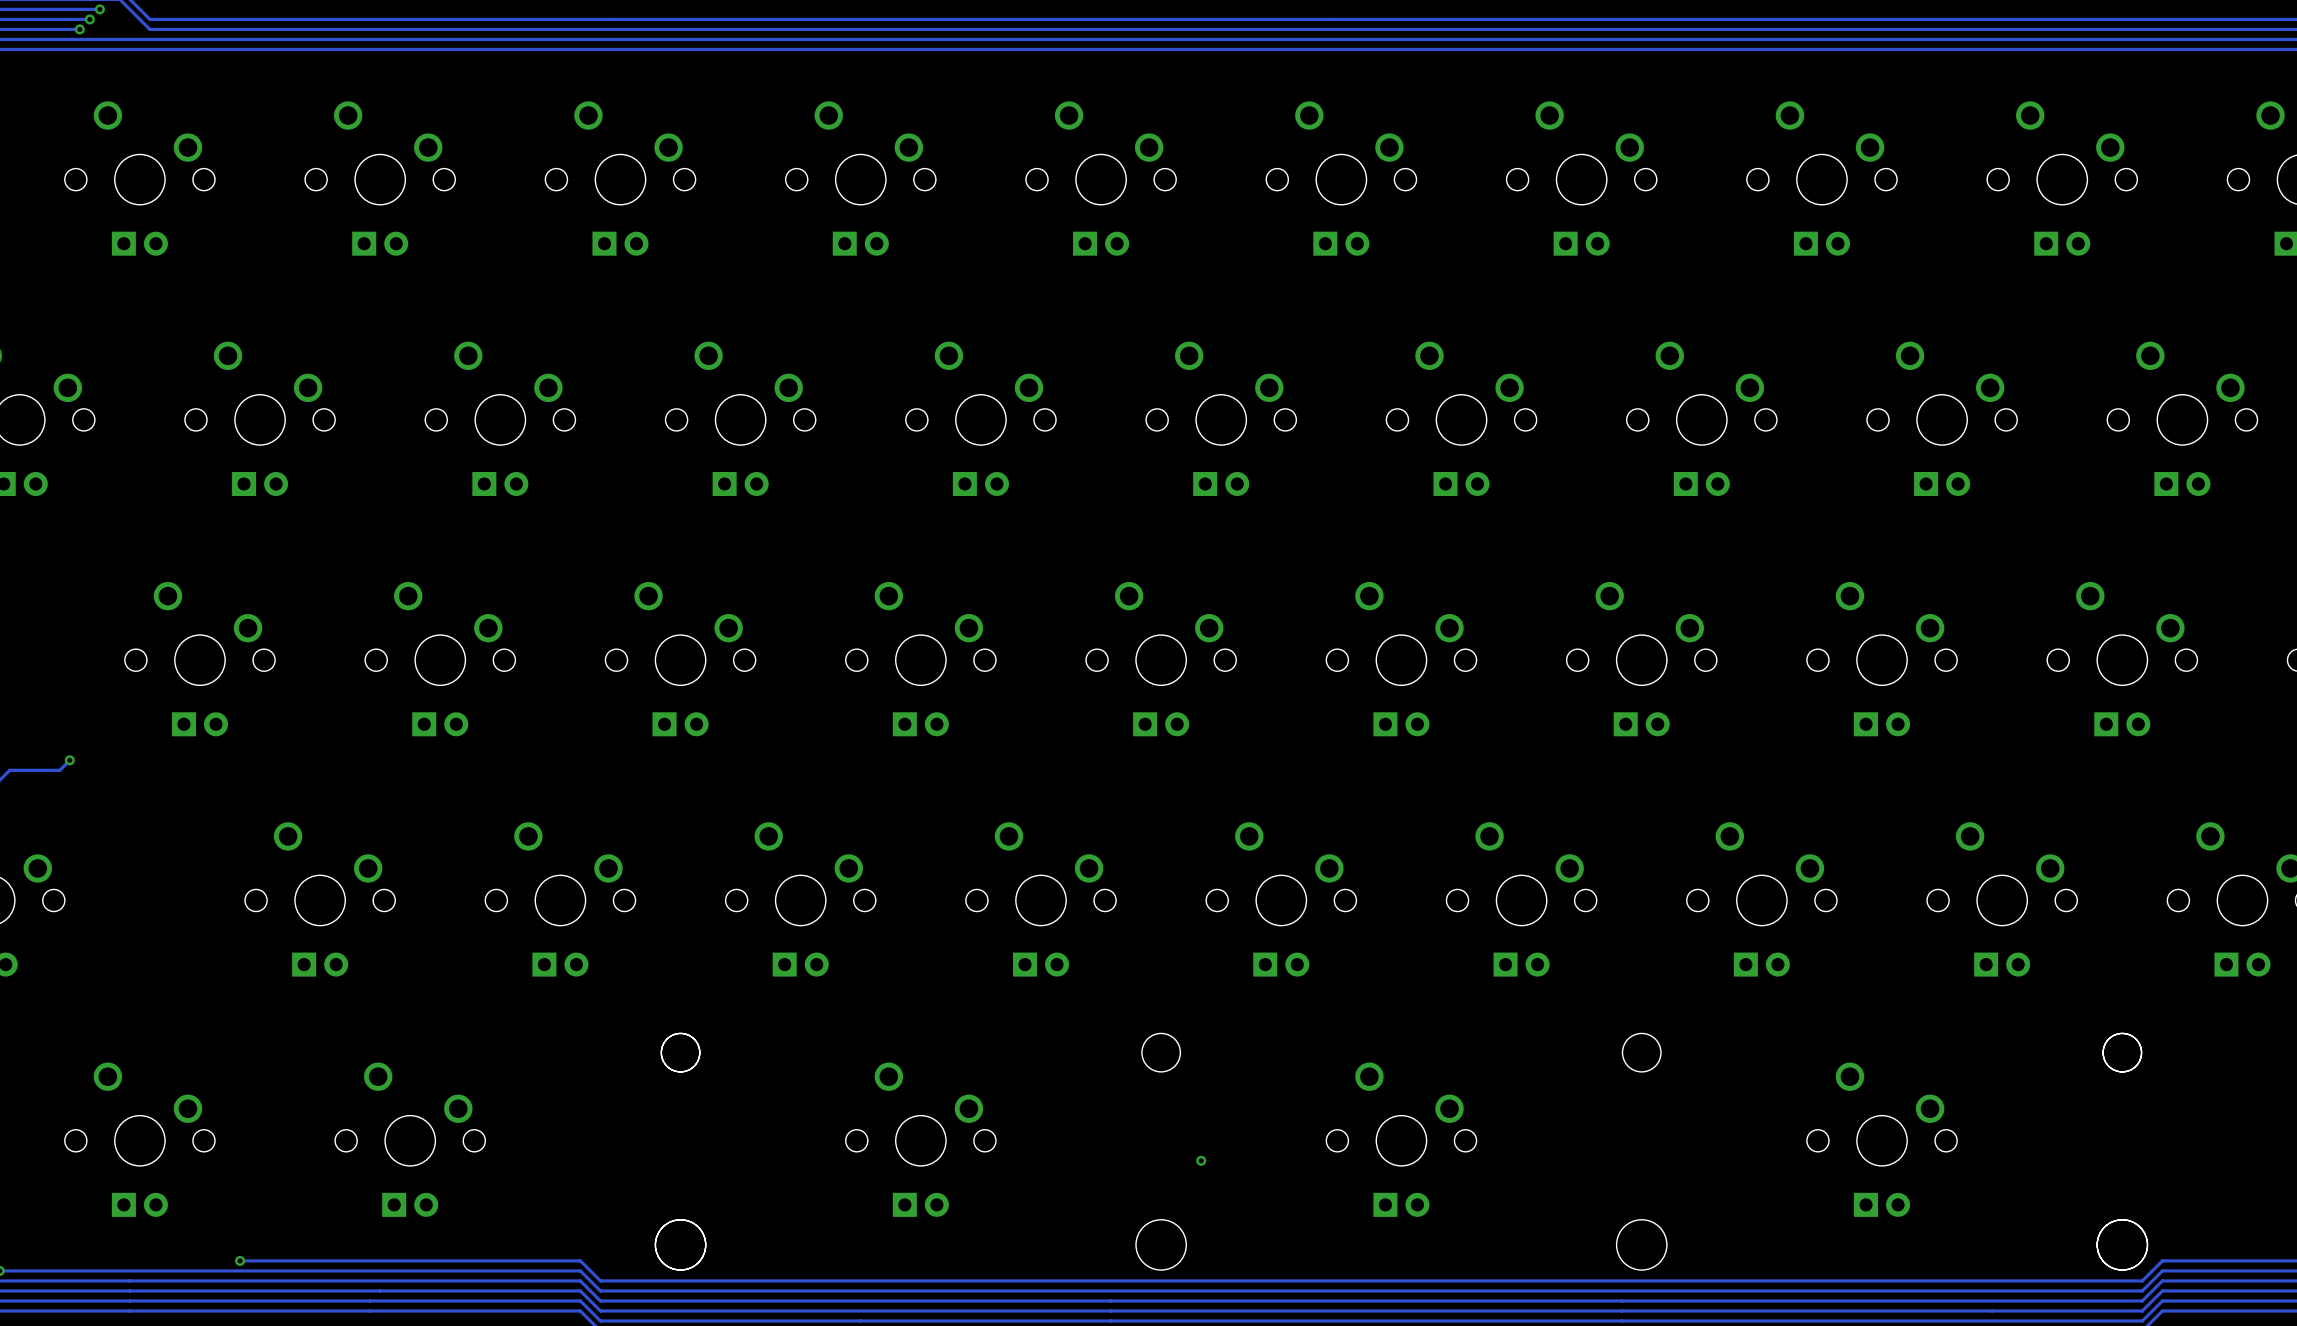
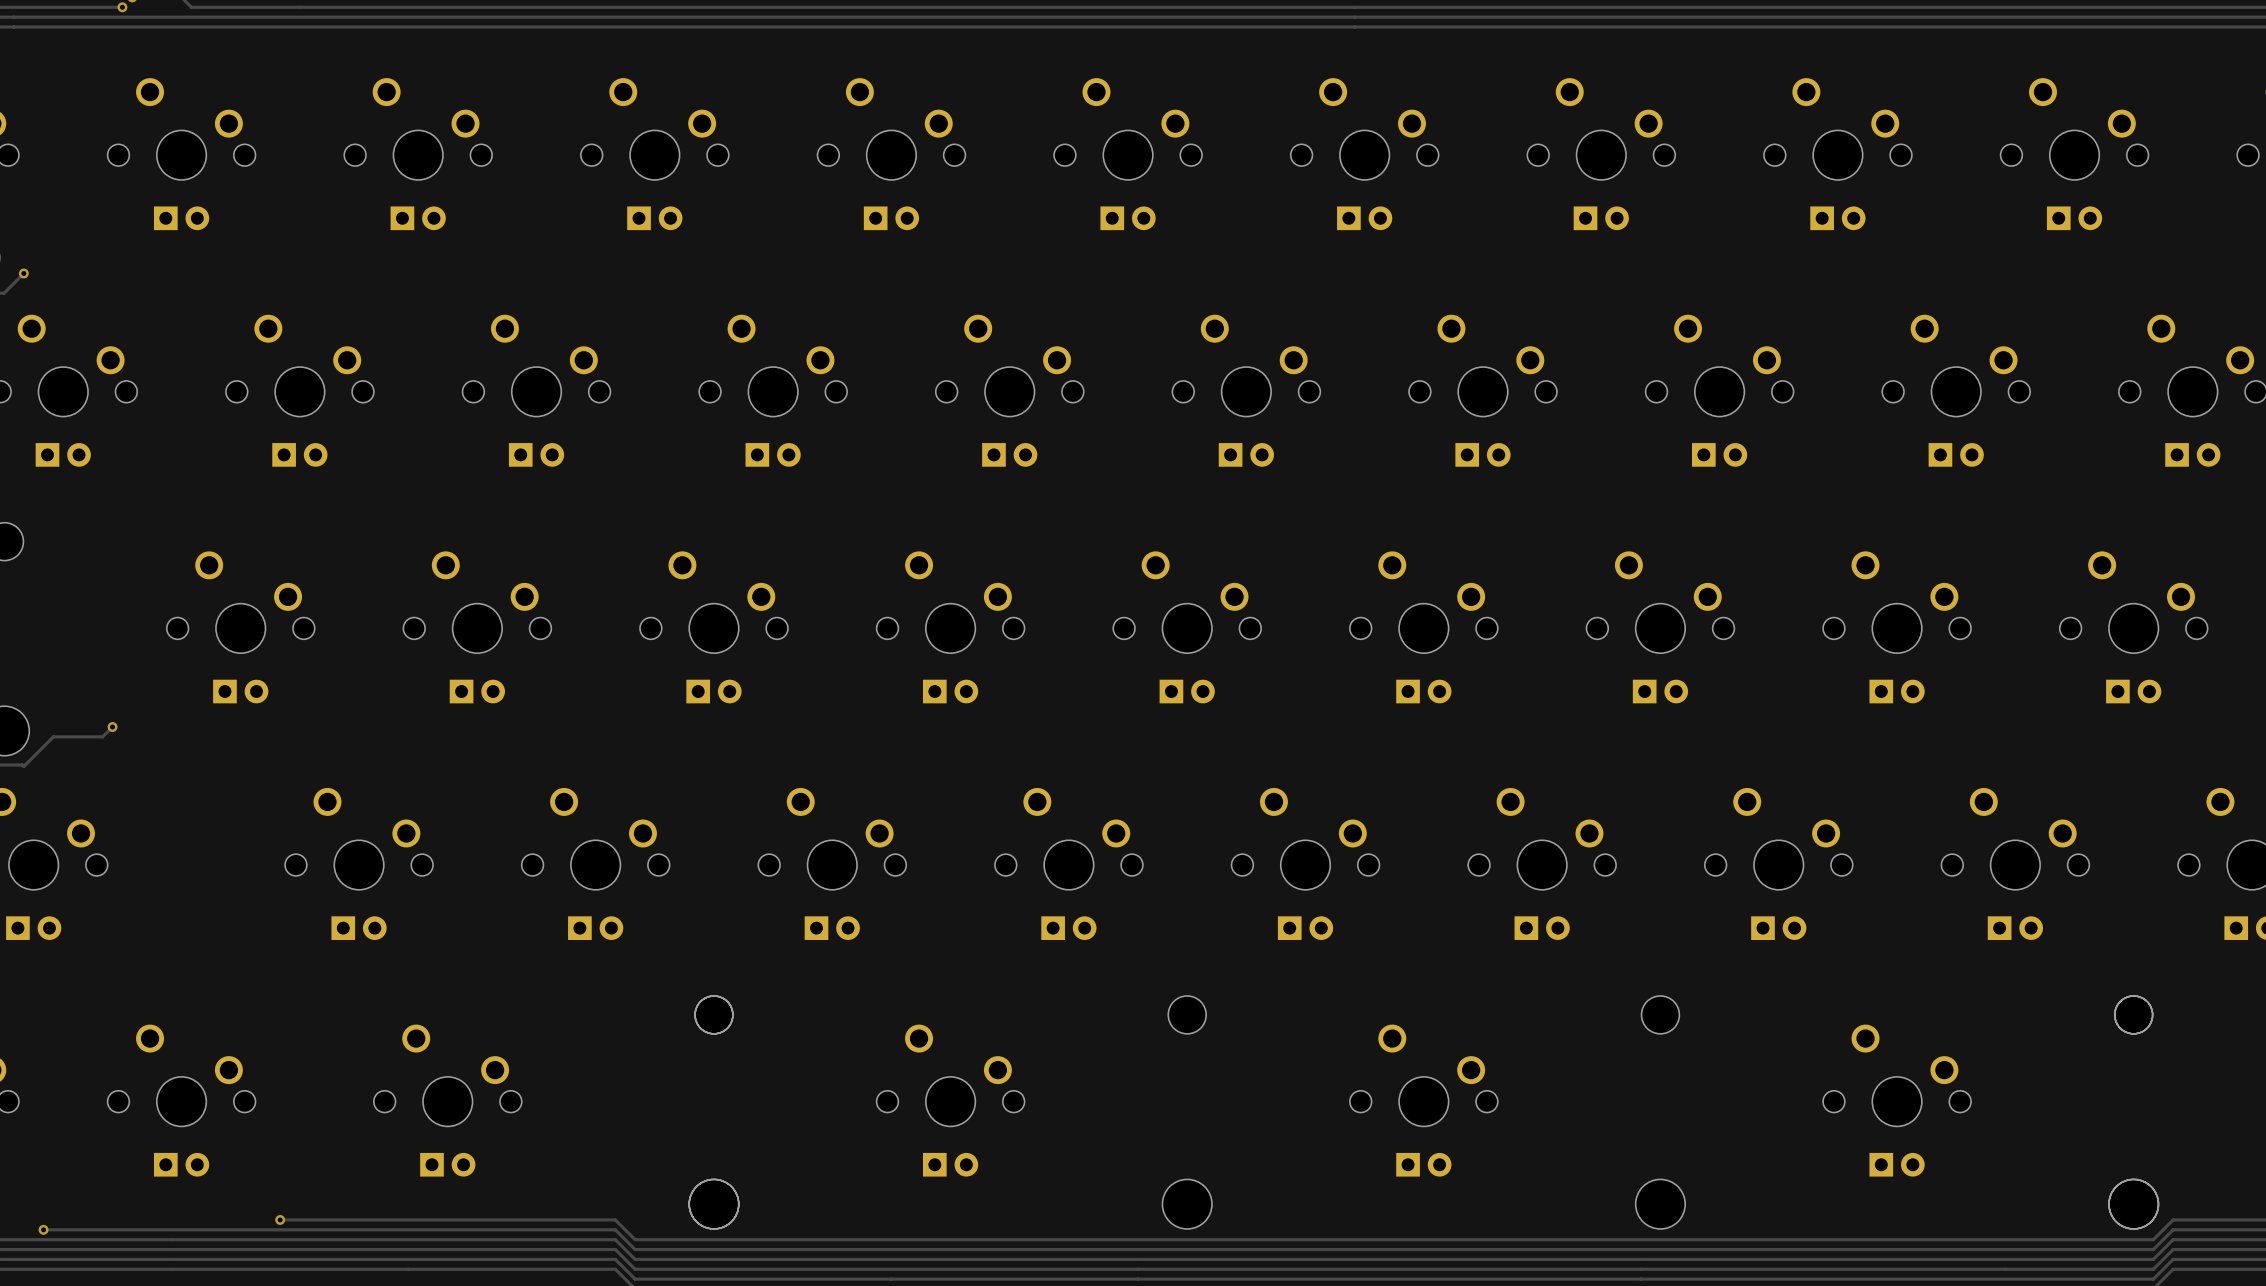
via: (1201, 1160) -> none

